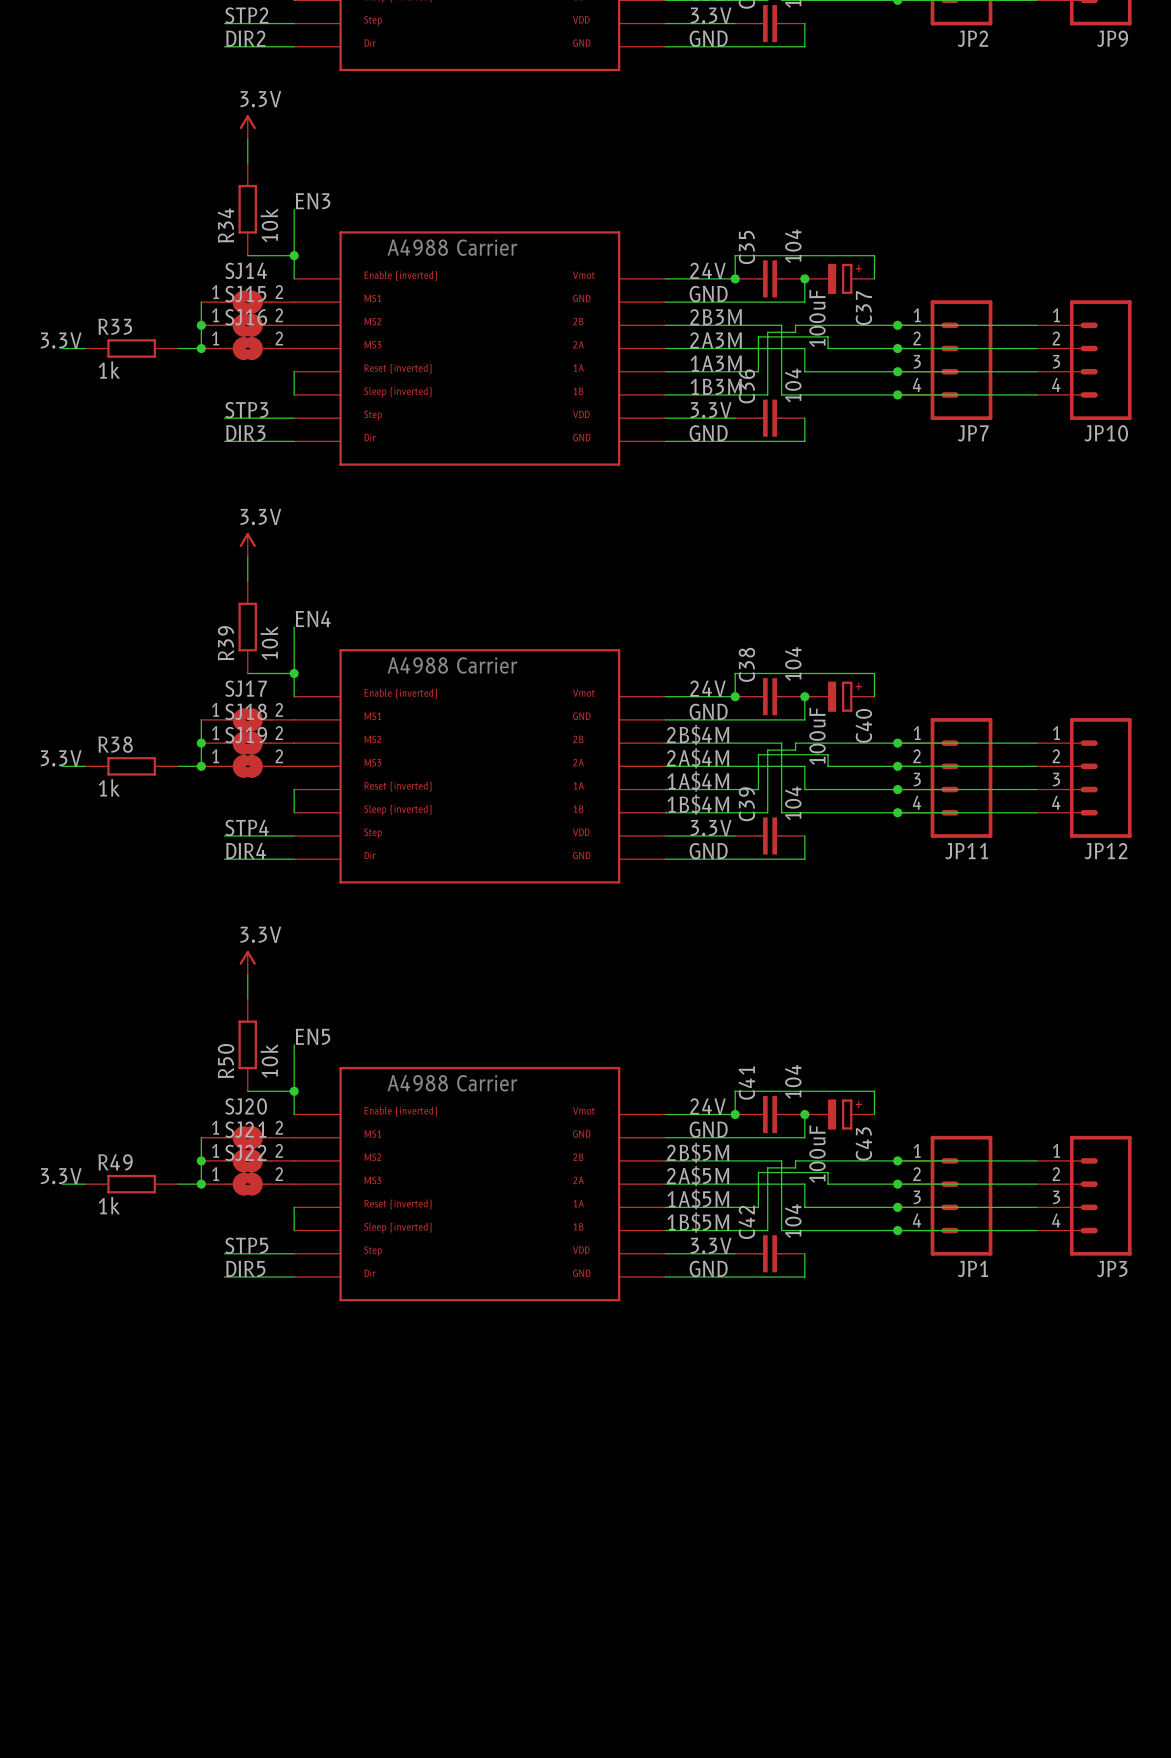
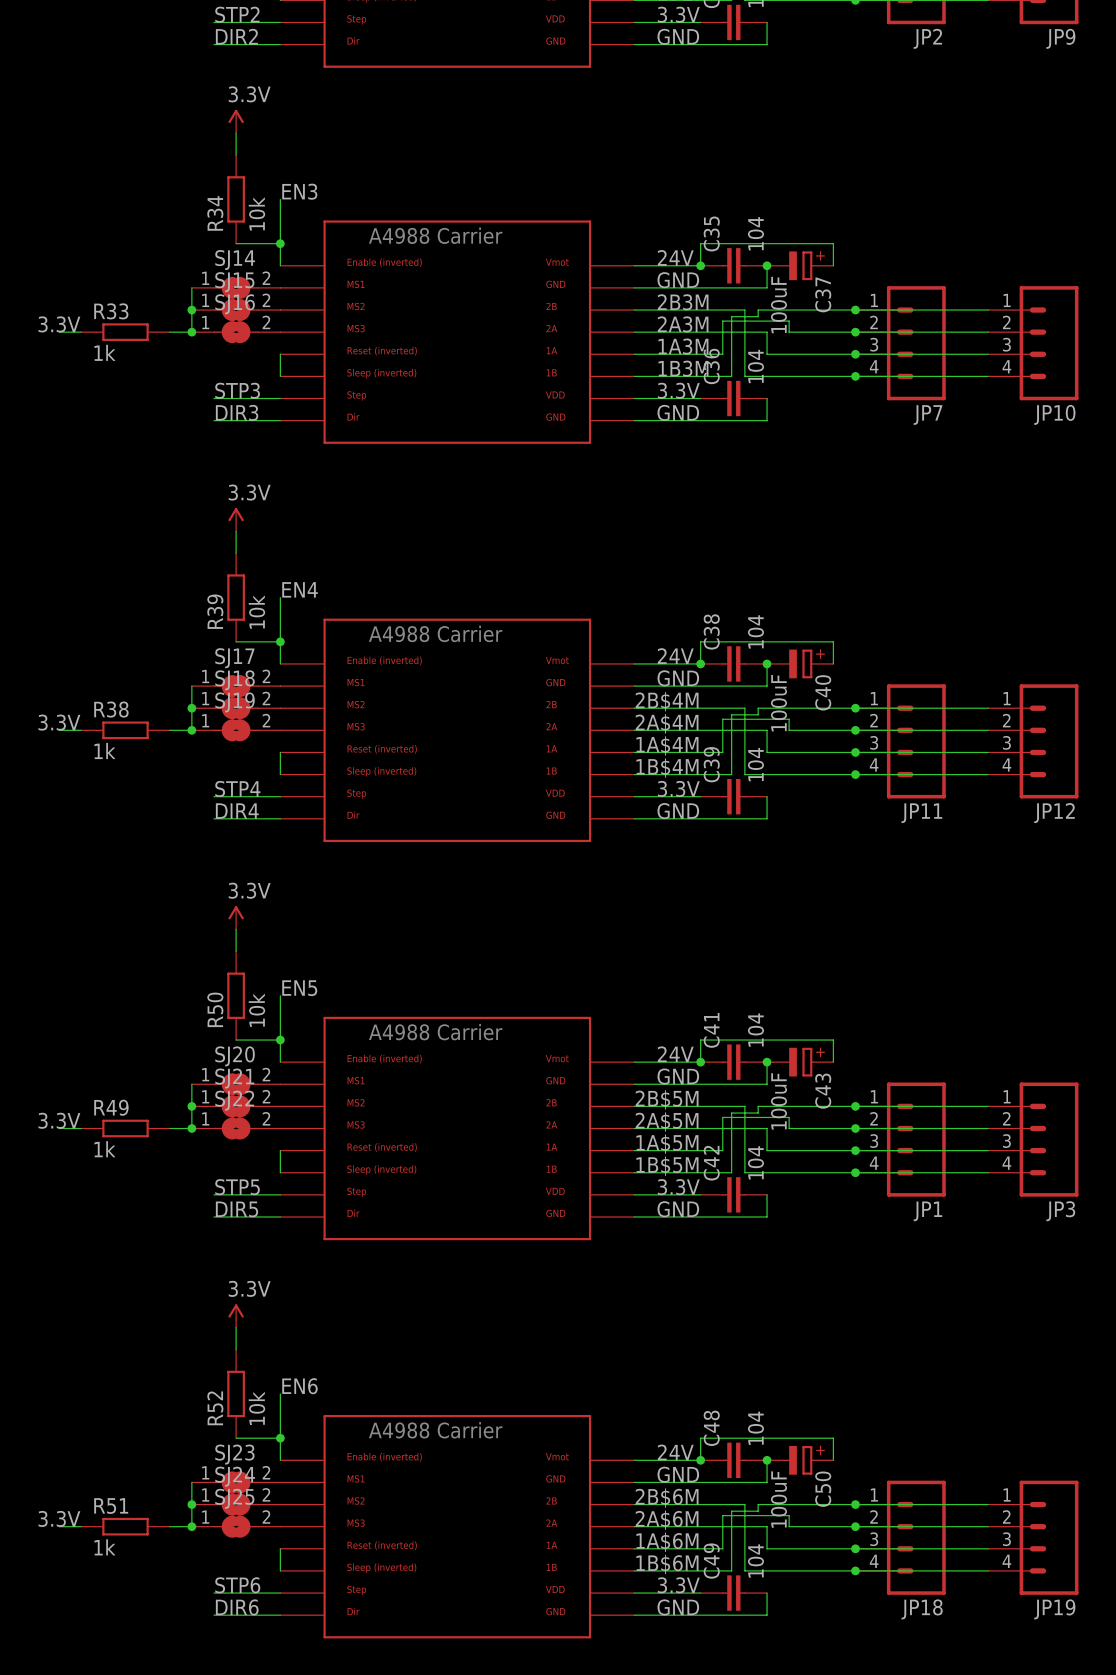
power symbol: none -> 3.3V (236, 1315)
wire: none -> (236, 1327) (236, 1349)
label: none -> EN6 (299, 1386)
R52: none -> 10k (236, 1393)
wire: none -> (280, 1393) (280, 1460)
wire: none -> (236, 1438) (280, 1438)
junction: none -> (280, 1438)
label: none -> 24V (675, 1452)
wire: none -> (634, 1460) (700, 1460) (700, 1438) (833, 1438) (833, 1460)
junction: none -> (700, 1460)
C48: none -> 104 (733, 1460)
wire: none -> (767, 1460) (767, 1482) (634, 1482)
junction: none -> (767, 1460)
C50: none -> 100uF (800, 1460)
label: none -> GND (678, 1474)
wire: none -> (191, 1482) (191, 1526) (169, 1526)
SJ23: none -> (236, 1482)
label: none -> 2B$6M (667, 1498)
junction: none -> (191, 1504)
SJ24: none -> (236, 1504)
wire: none -> (634, 1504) (744, 1504) (744, 1570) (988, 1570)
junction: none -> (855, 1504)
wire: none -> (988, 1504) (758, 1504) (758, 1511) (731, 1511) (731, 1570) (634, 1570)
label: none -> 3.3V (59, 1518)
label: none -> 2A$6M (667, 1520)
wire: none -> (59, 1526) (81, 1526)
R51: none -> 1k (125, 1526)
junction: none -> (191, 1526)
SJ25: none -> (236, 1526)
part: none -> (457, 1526)
wire: none -> (634, 1526) (767, 1526) (767, 1548) (988, 1548)
junction: none -> (855, 1526)
wire: none -> (988, 1526) (789, 1526) (789, 1515) (722, 1515) (722, 1548) (634, 1548)
JP18: none -> (900, 1537)
JP19: none -> (1033, 1537)
label: none -> 1A$6M (667, 1542)
wire: none -> (280, 1548) (280, 1570)
junction: none -> (855, 1548)
label: none -> 1B$6M (667, 1564)
junction: none -> (855, 1570)
label: none -> STP6 (237, 1585)
label: none -> 3.3V (678, 1585)
wire: none -> (213, 1593) (280, 1593)
wire: none -> (634, 1593) (700, 1593)
C49: none -> 104 (733, 1593)
wire: none -> (767, 1593) (767, 1615) (634, 1615)
label: none -> DIR6 (237, 1607)
label: none -> GND (678, 1607)
wire: none -> (213, 1615) (280, 1615)

